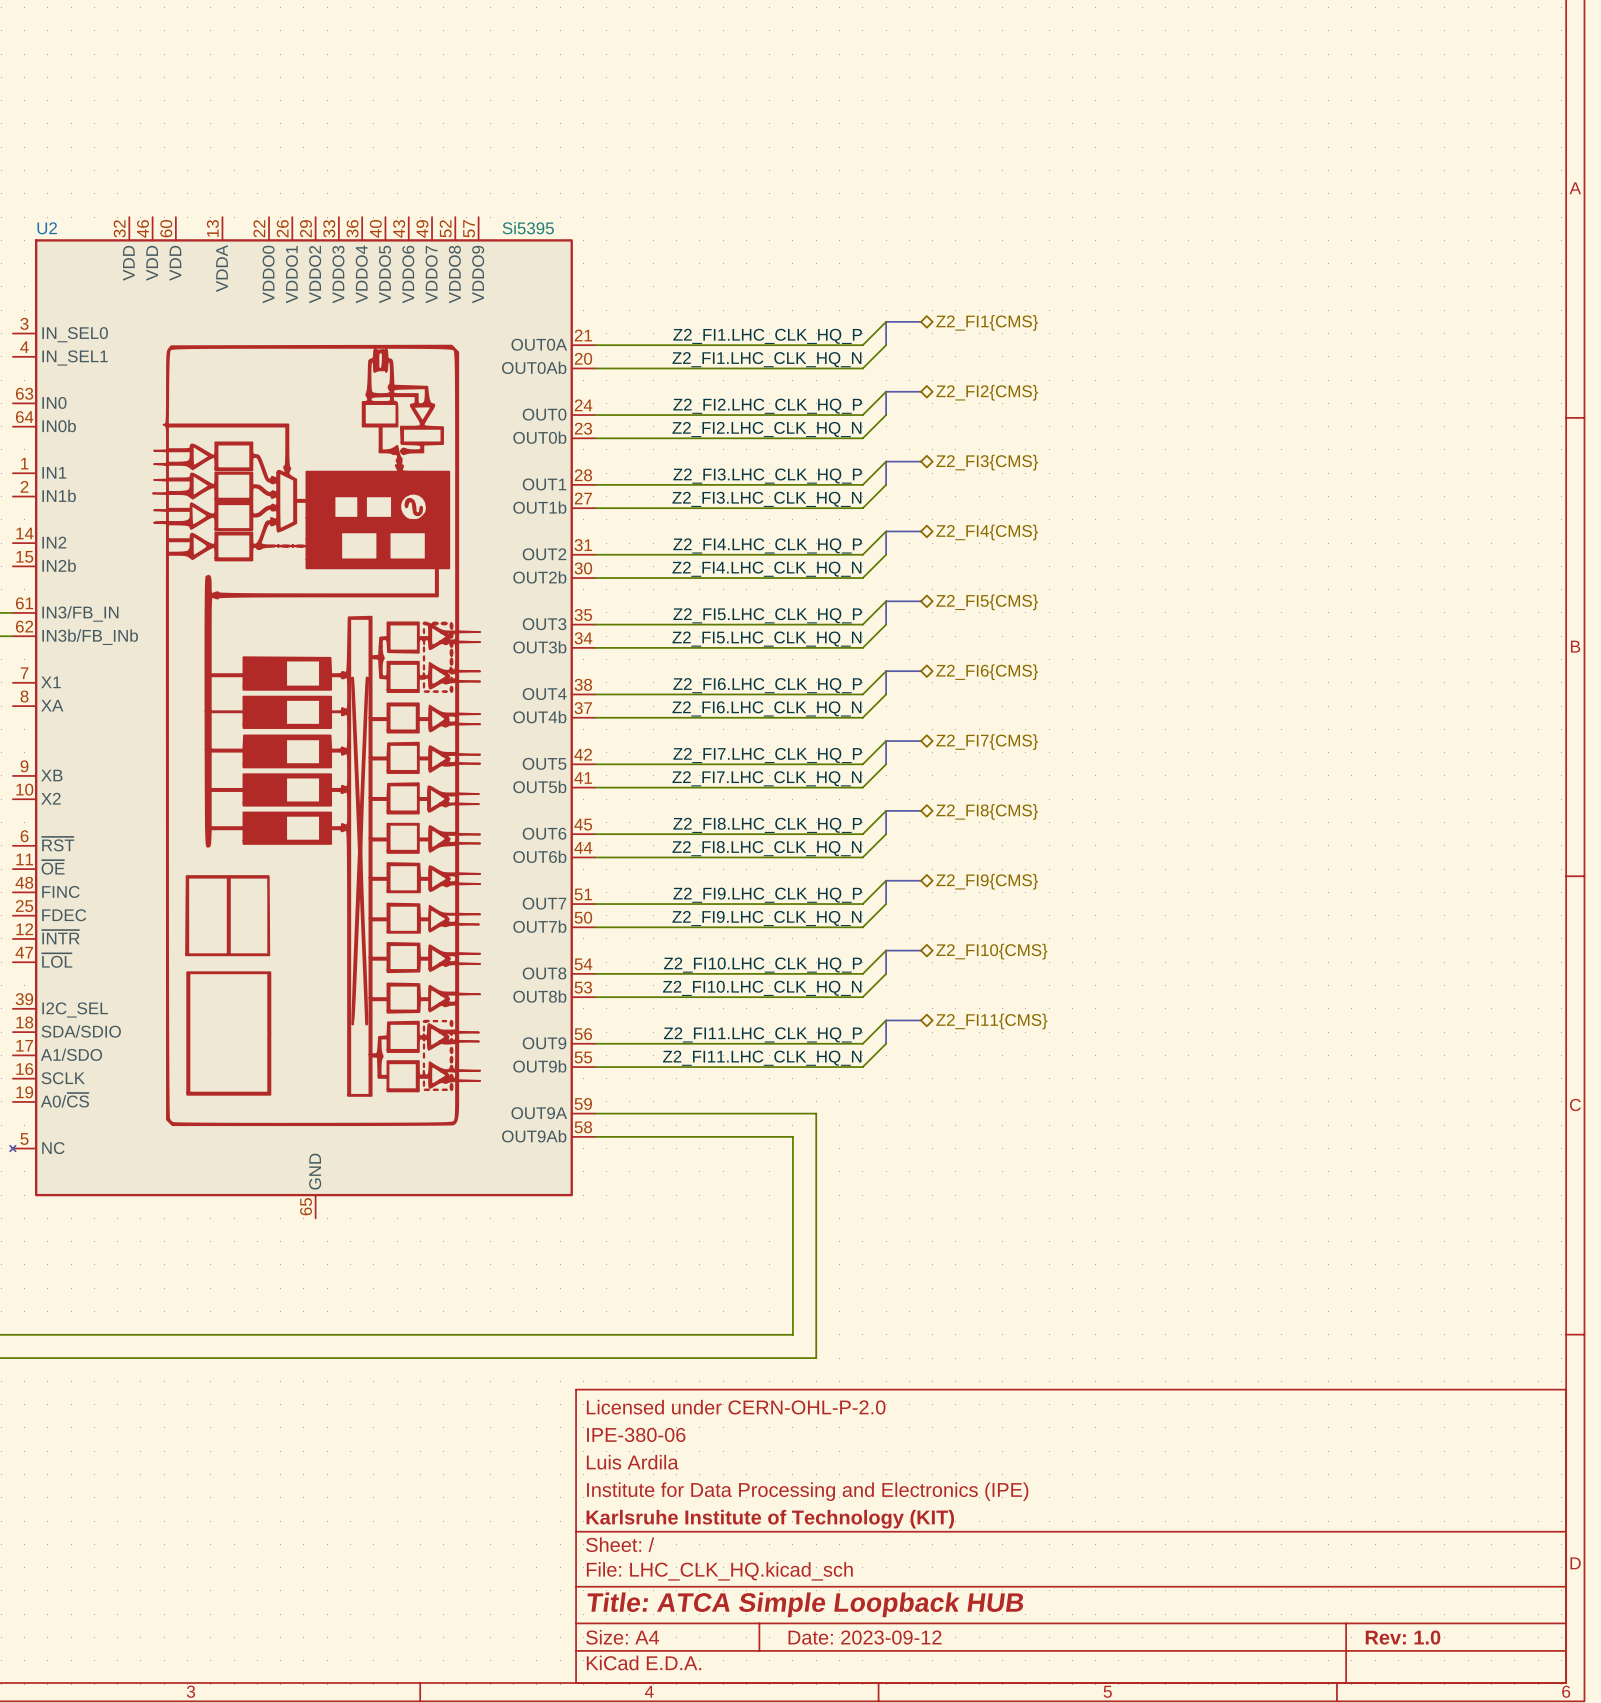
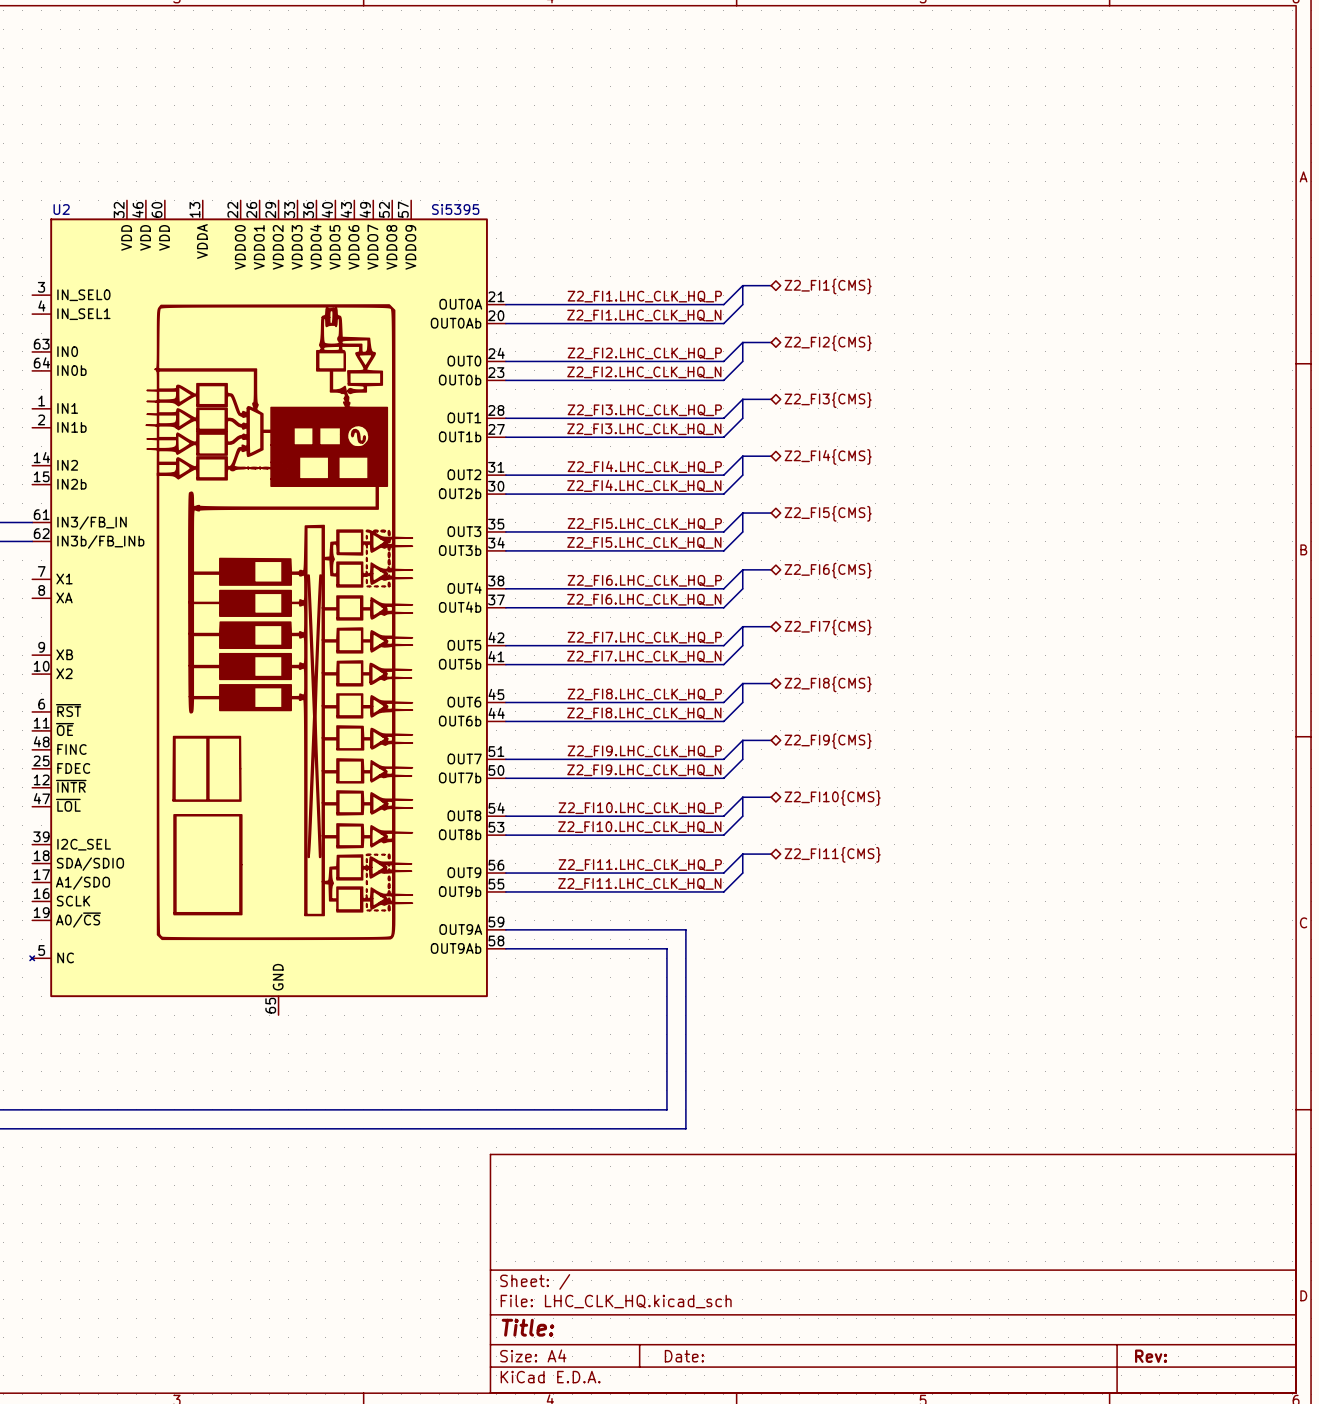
title block: Licensed under CERN-OHL-P-2.0 (736, 1407) -> none
title block: IPE-380-06 (636, 1434) -> none
title block: Luis Ardila (632, 1462) -> none
title block: Institute for Data Processing and Electronics (IPE) (807, 1491) -> none
title block: Karlsruhe Institute of Technology (KIT) (770, 1519) -> none
title block: Title: ATCA Simple Loopback HUB (805, 1604) -> Title: (528, 1327)
title block: Date: 2023-09-12 (865, 1637) -> Date: (684, 1356)
title block: Rev: 1.0 (1403, 1637) -> Rev: (1151, 1356)

